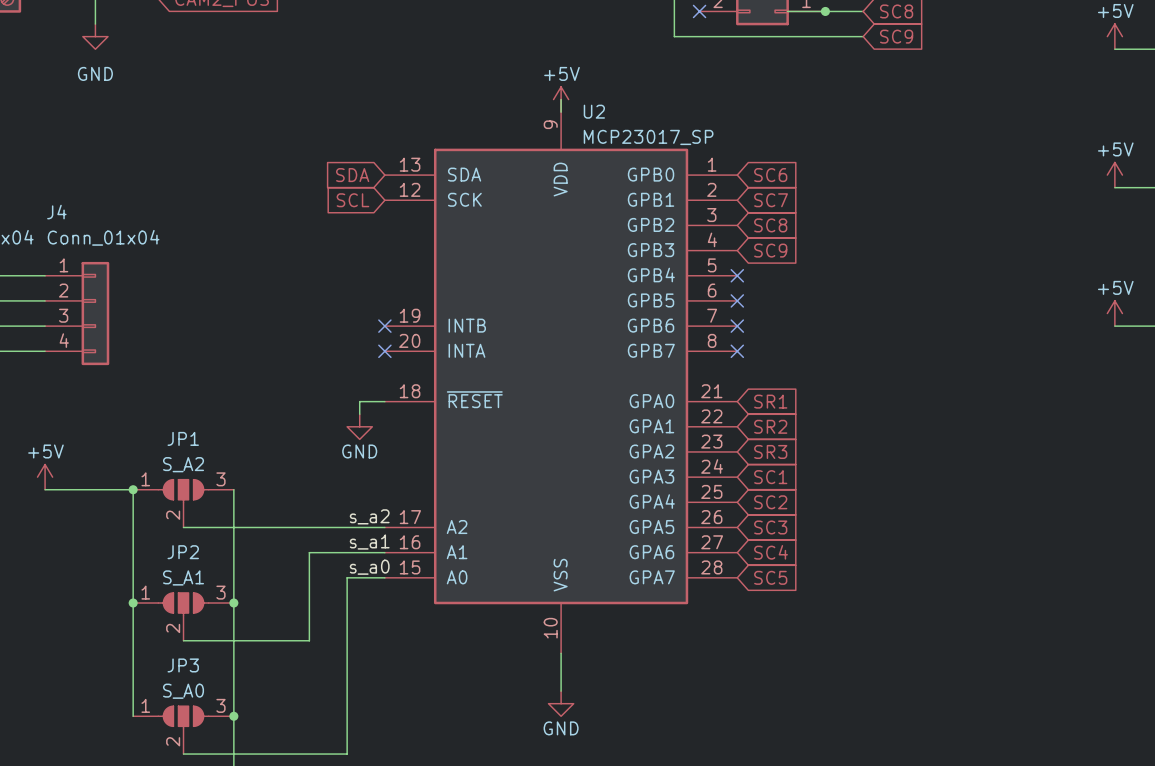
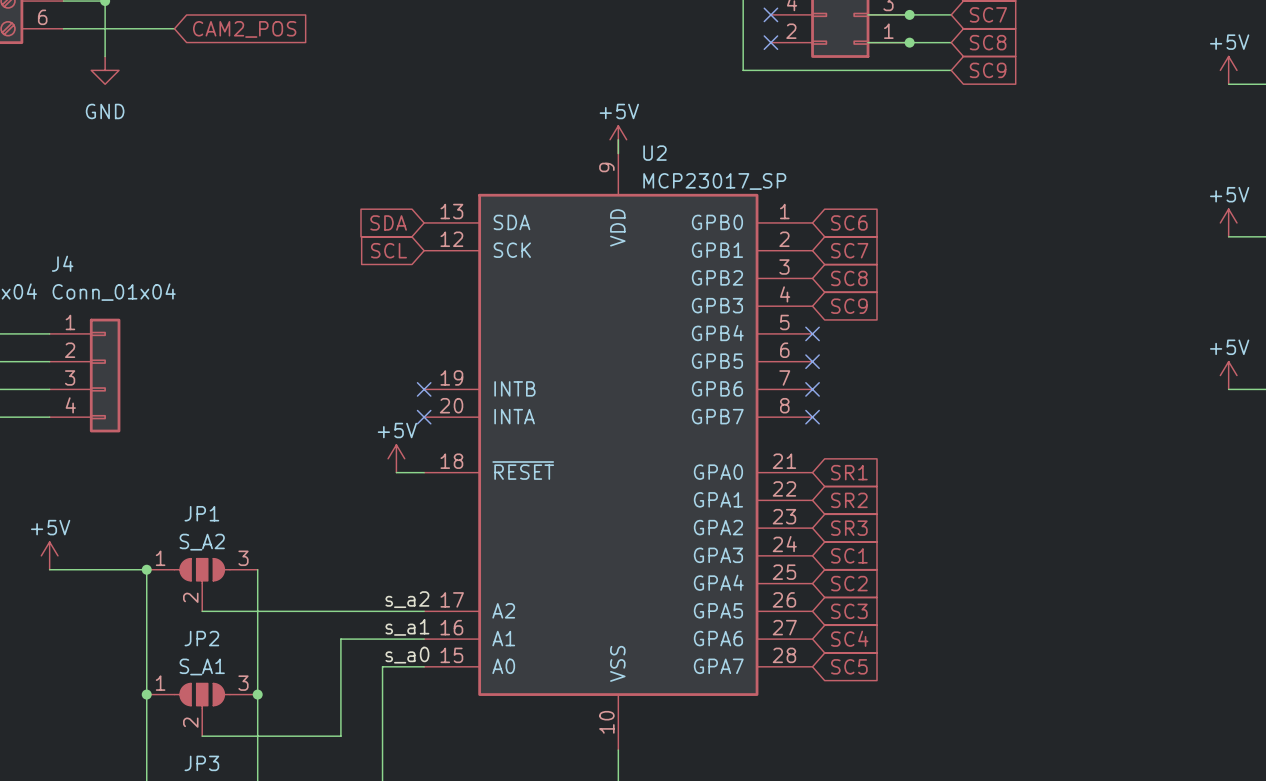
power symbol: none -> +5V (396, 458)
wire: (359, 401) (359, 414) -> none
power symbol: GND (359, 426) -> none

